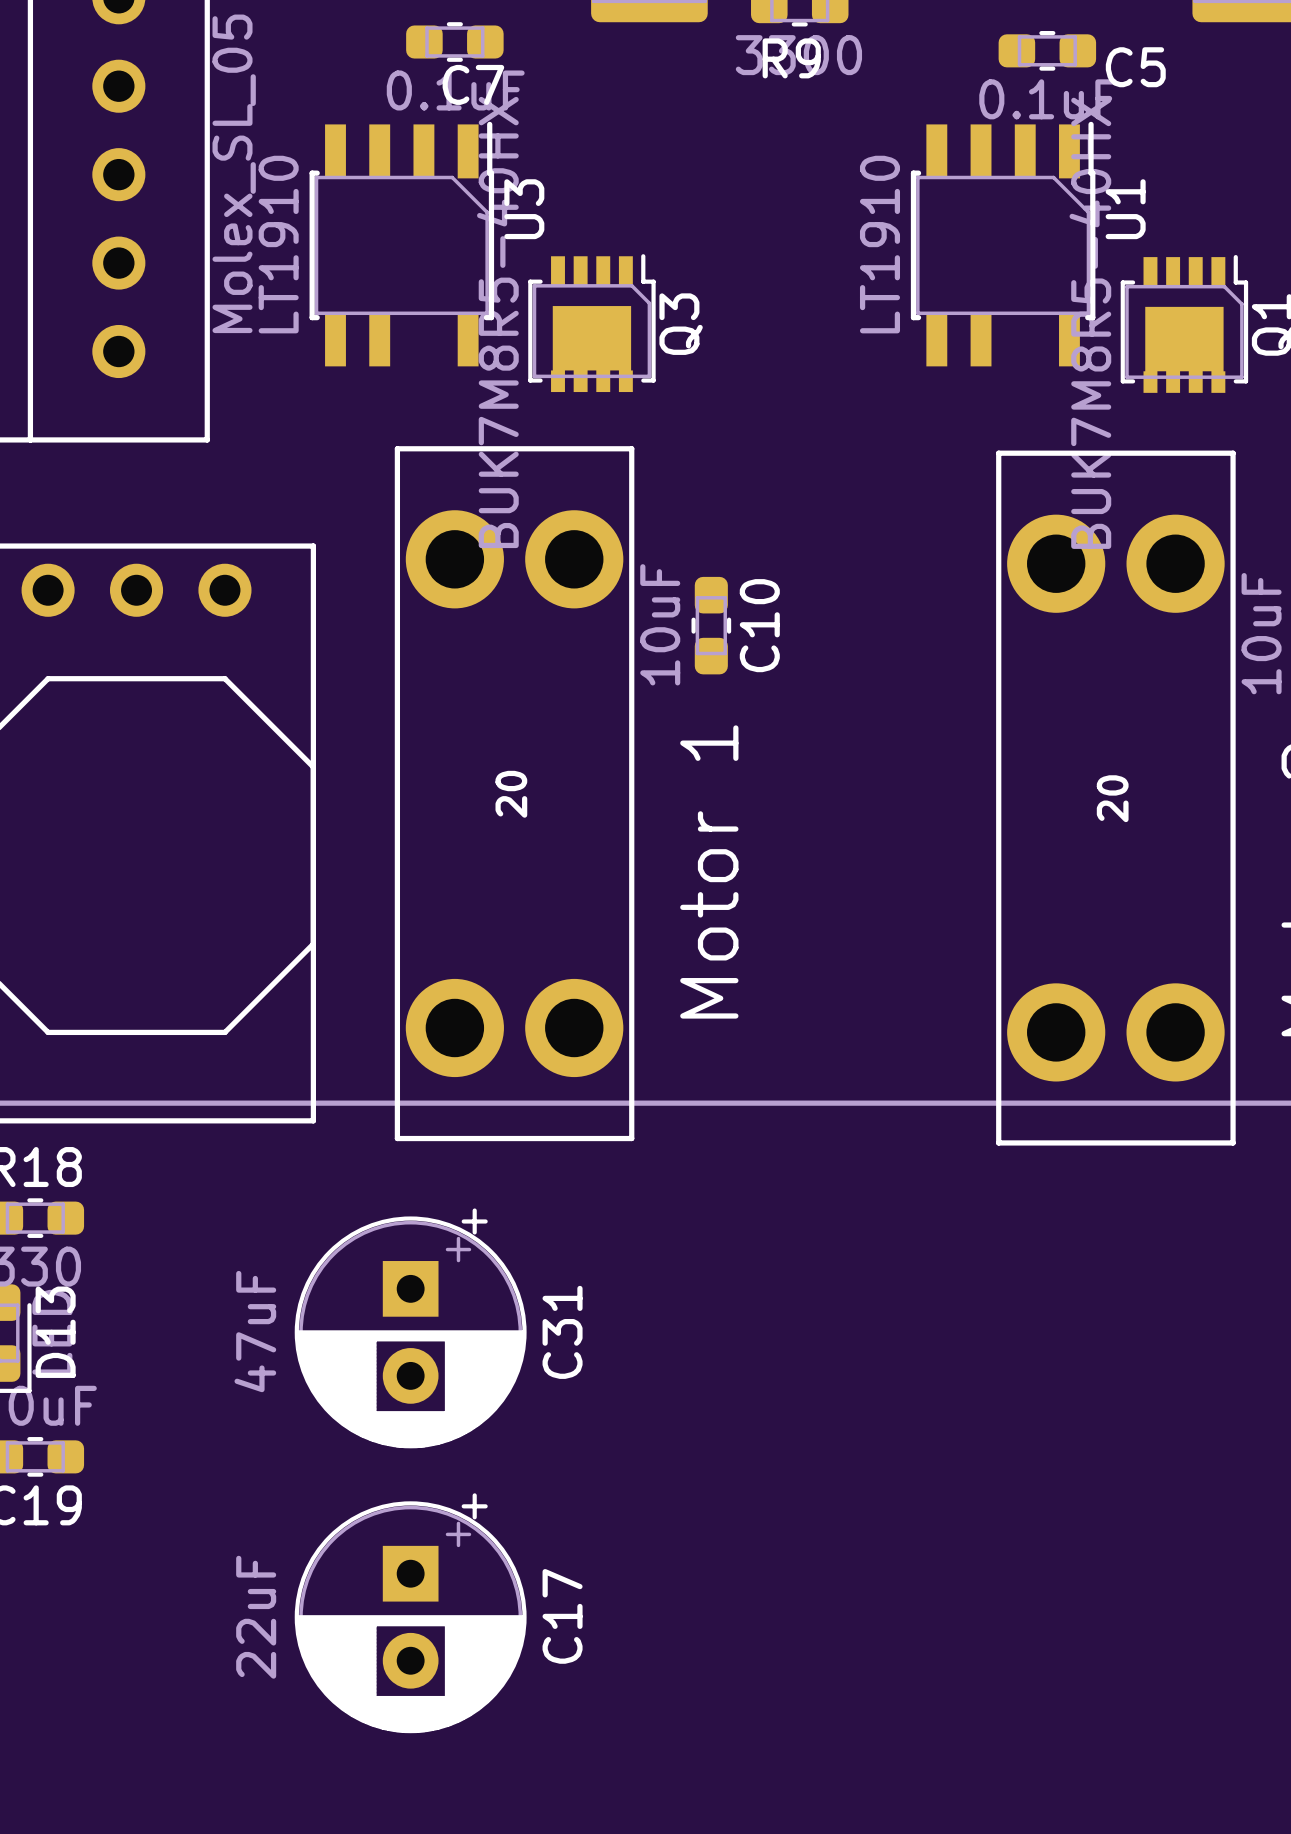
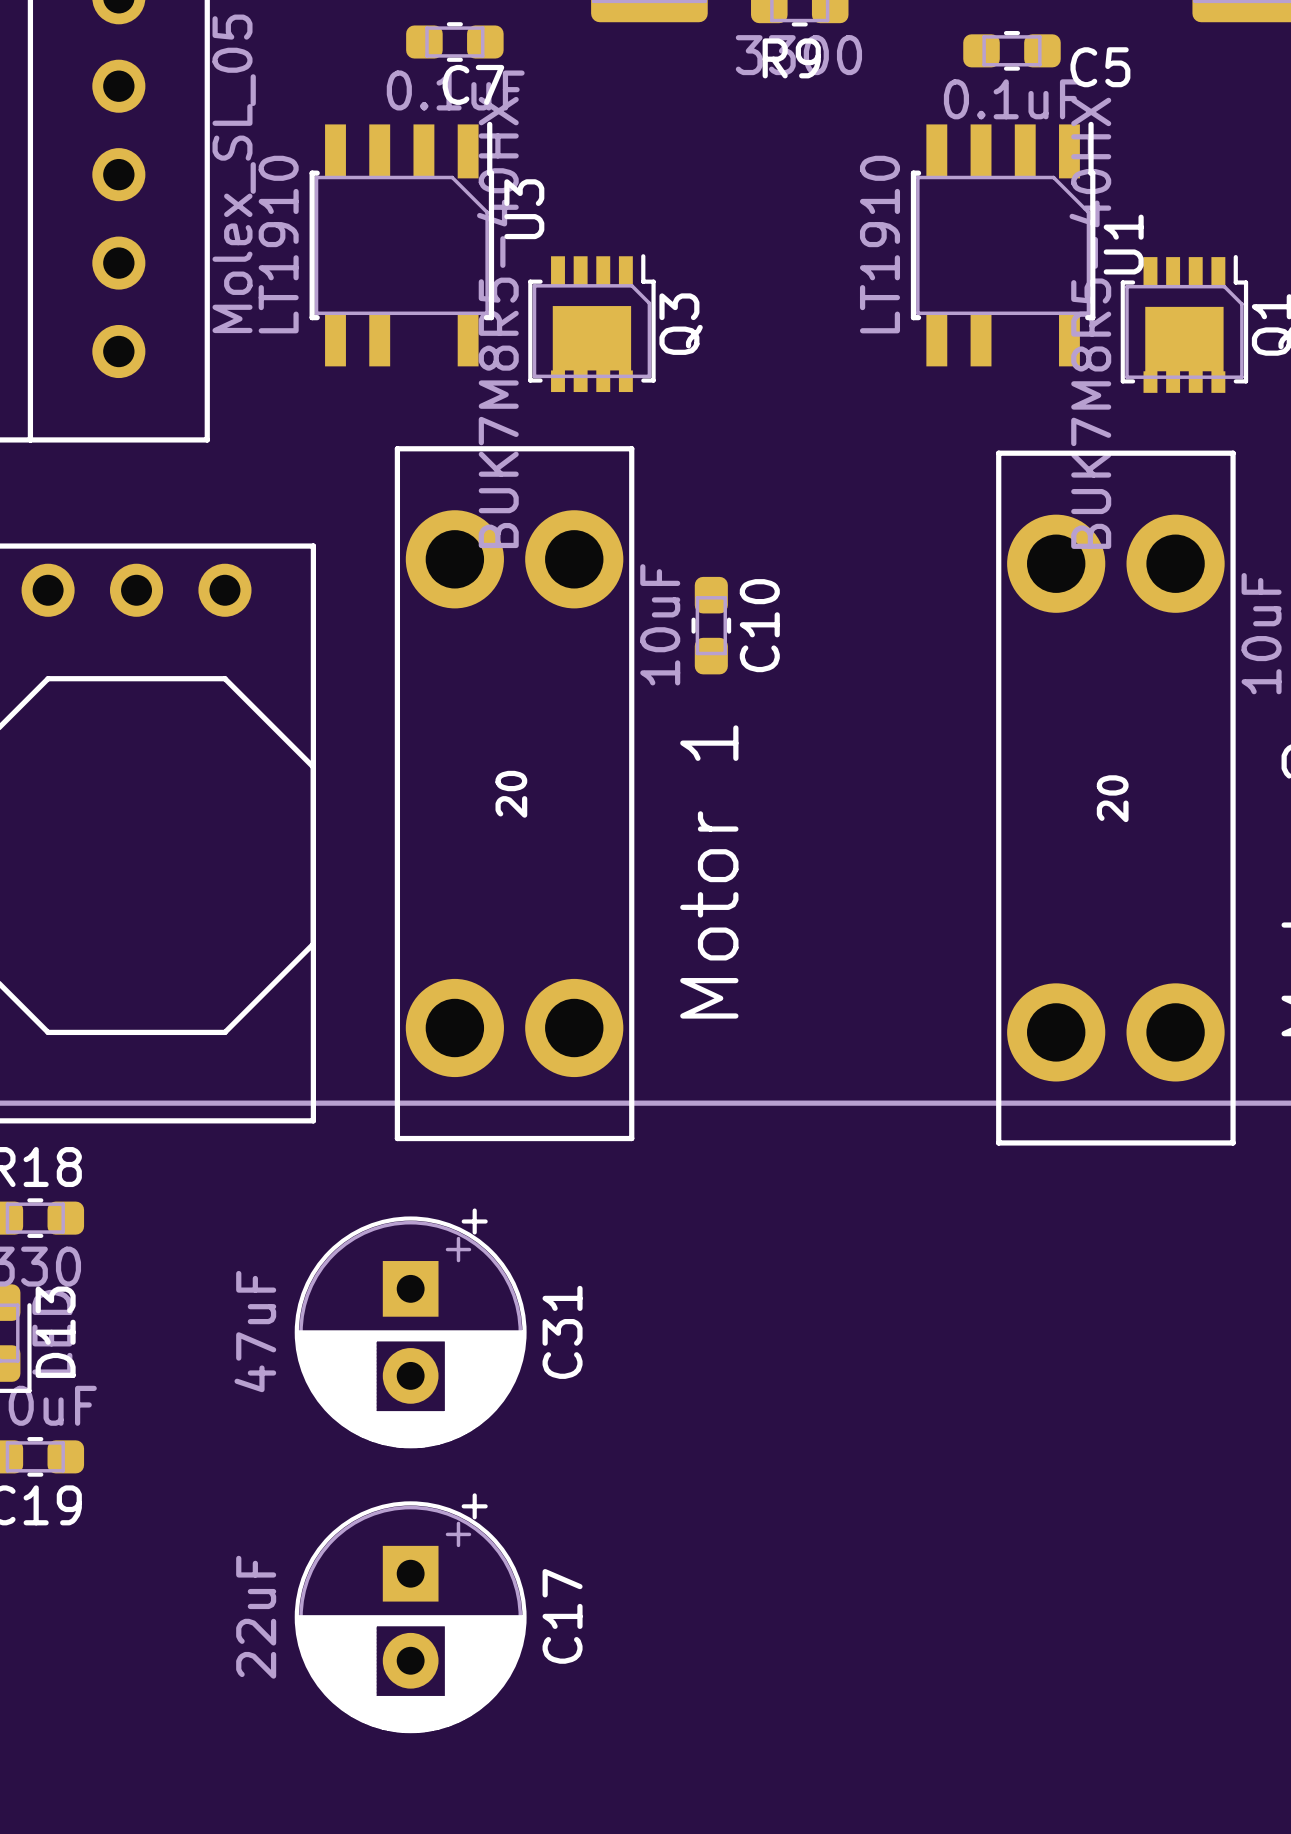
C5 position: (1047, 50) -> (1011, 50)
U1 name position: U1 (1125, 209) -> U1 (1123, 244)

